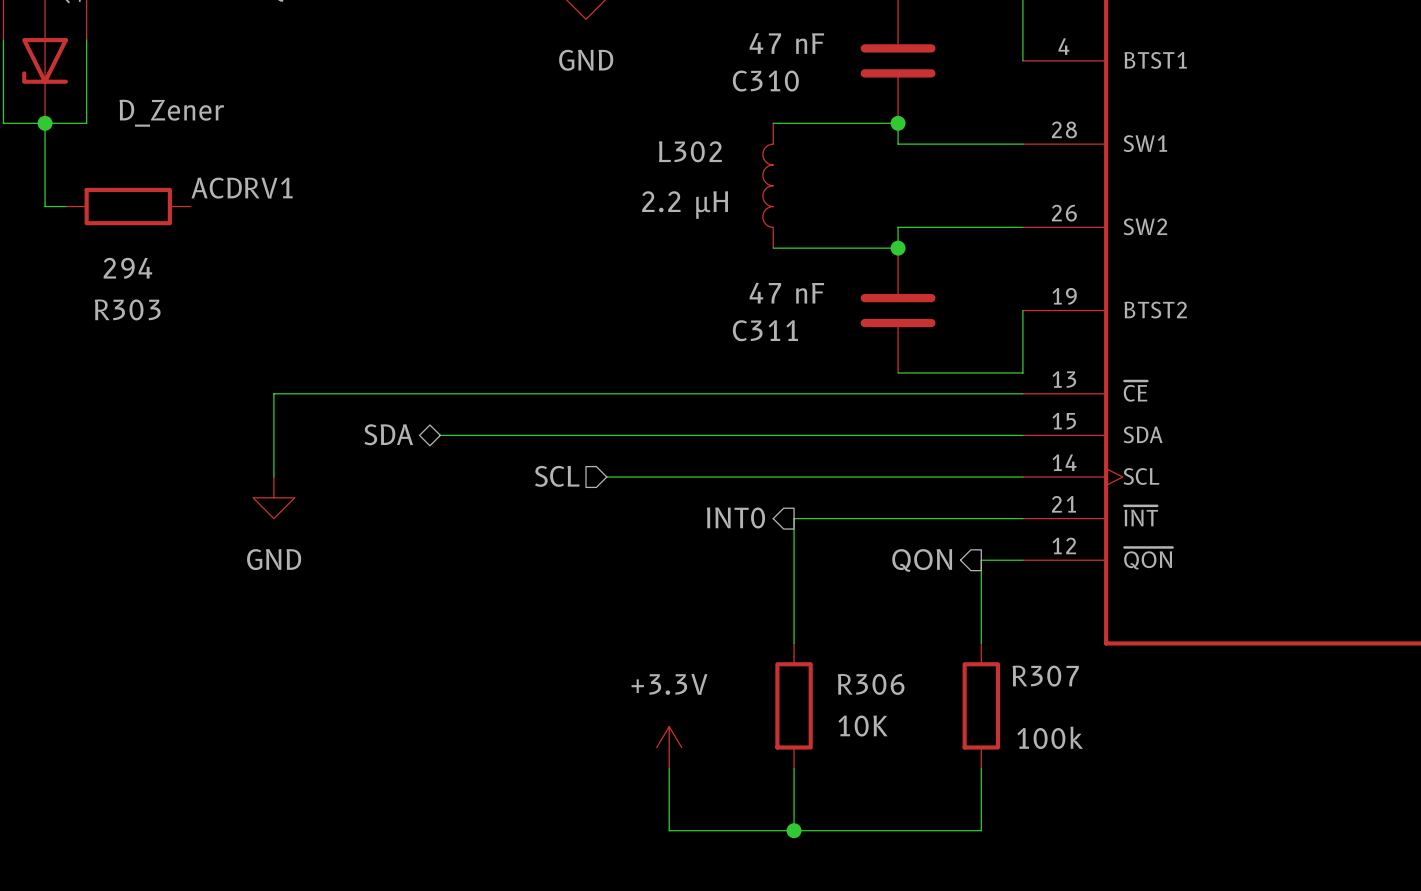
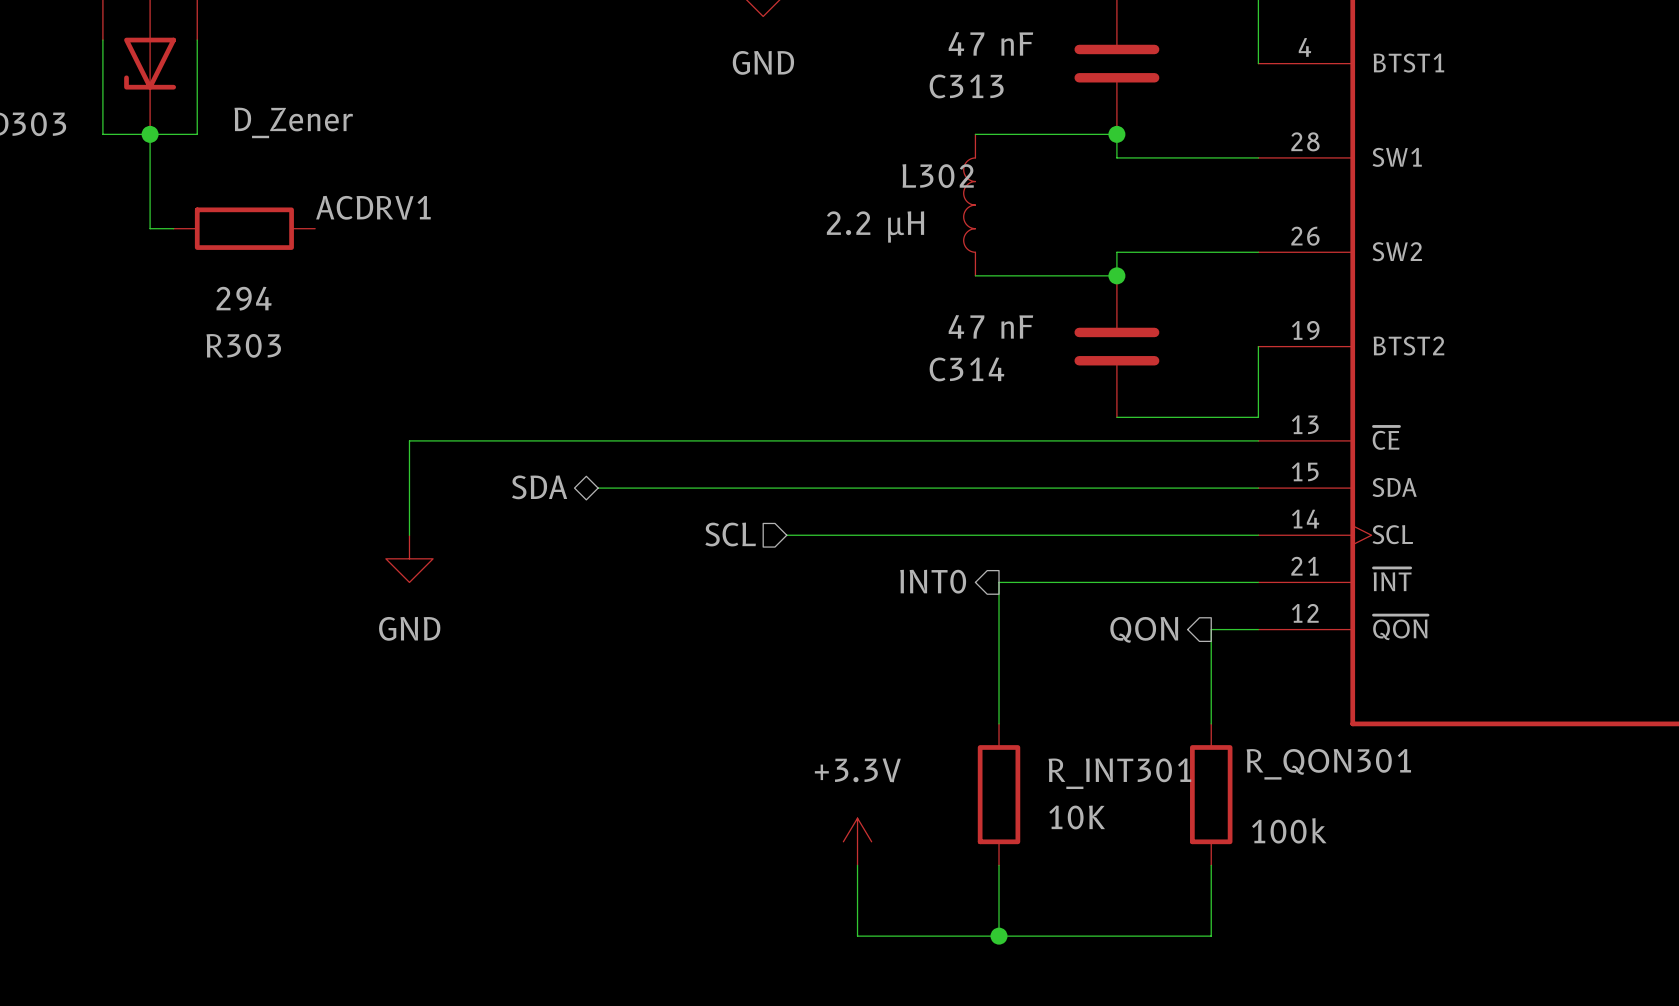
C310 name: C310 (765, 81) -> C313 (966, 86)
L302 name position: L302 (690, 151) -> L302 (938, 176)
C311 name: C311 (765, 330) -> C314 (966, 369)
R307 name: R307 (1045, 676) -> R_QON301 (1328, 764)
R306 name: R306 (871, 684) -> R_INT301 (1119, 773)

